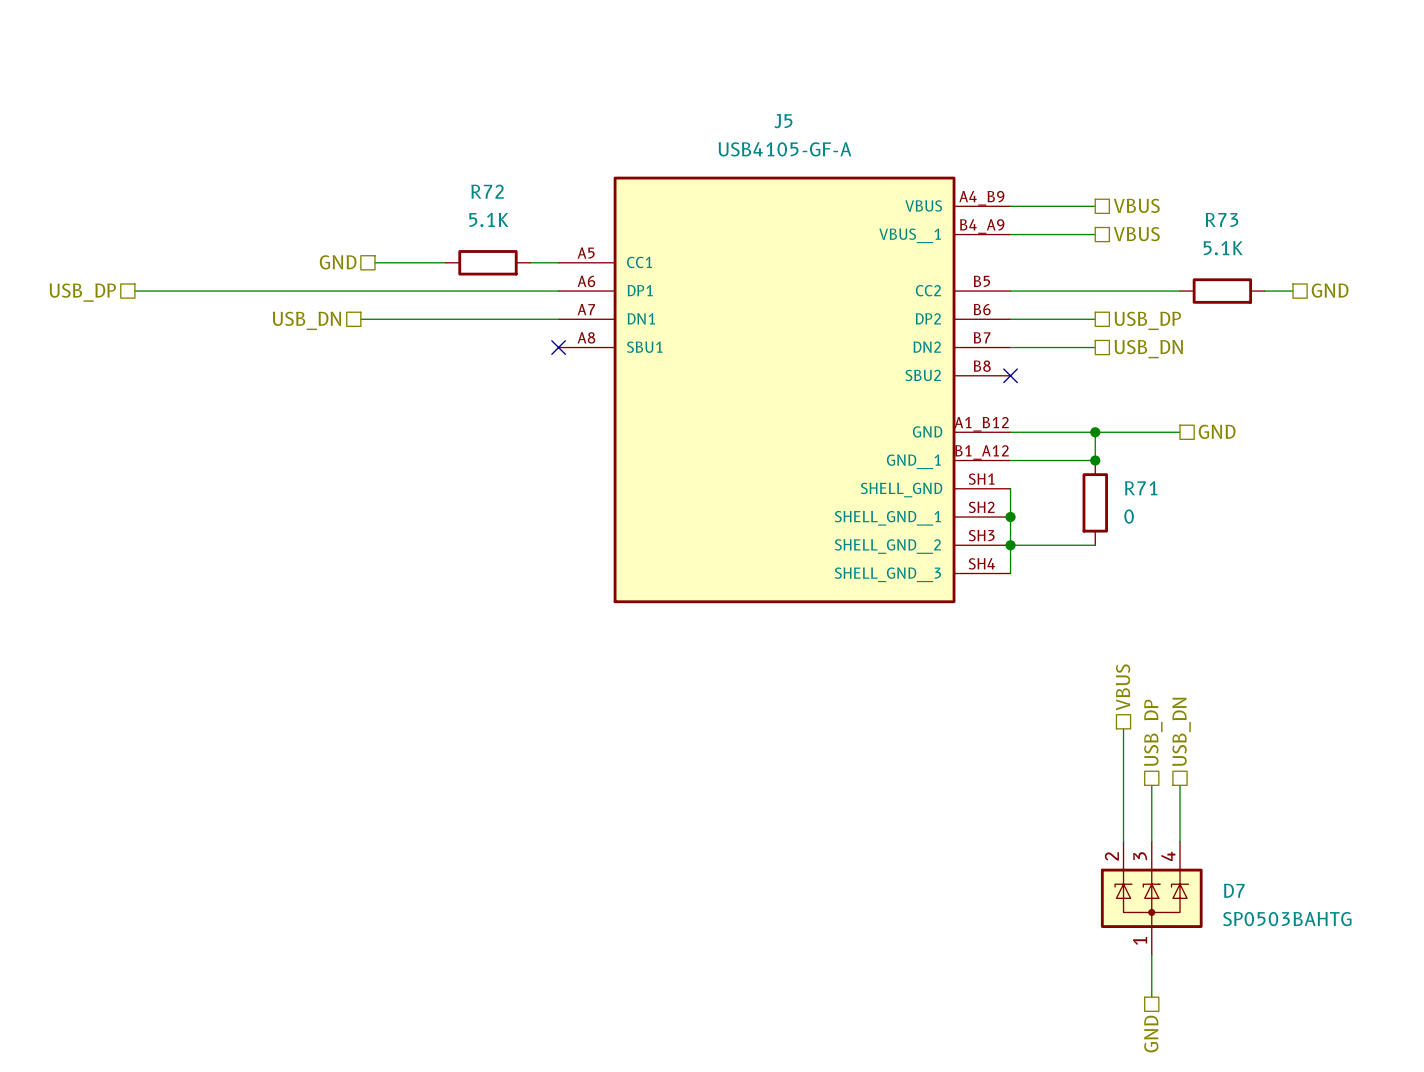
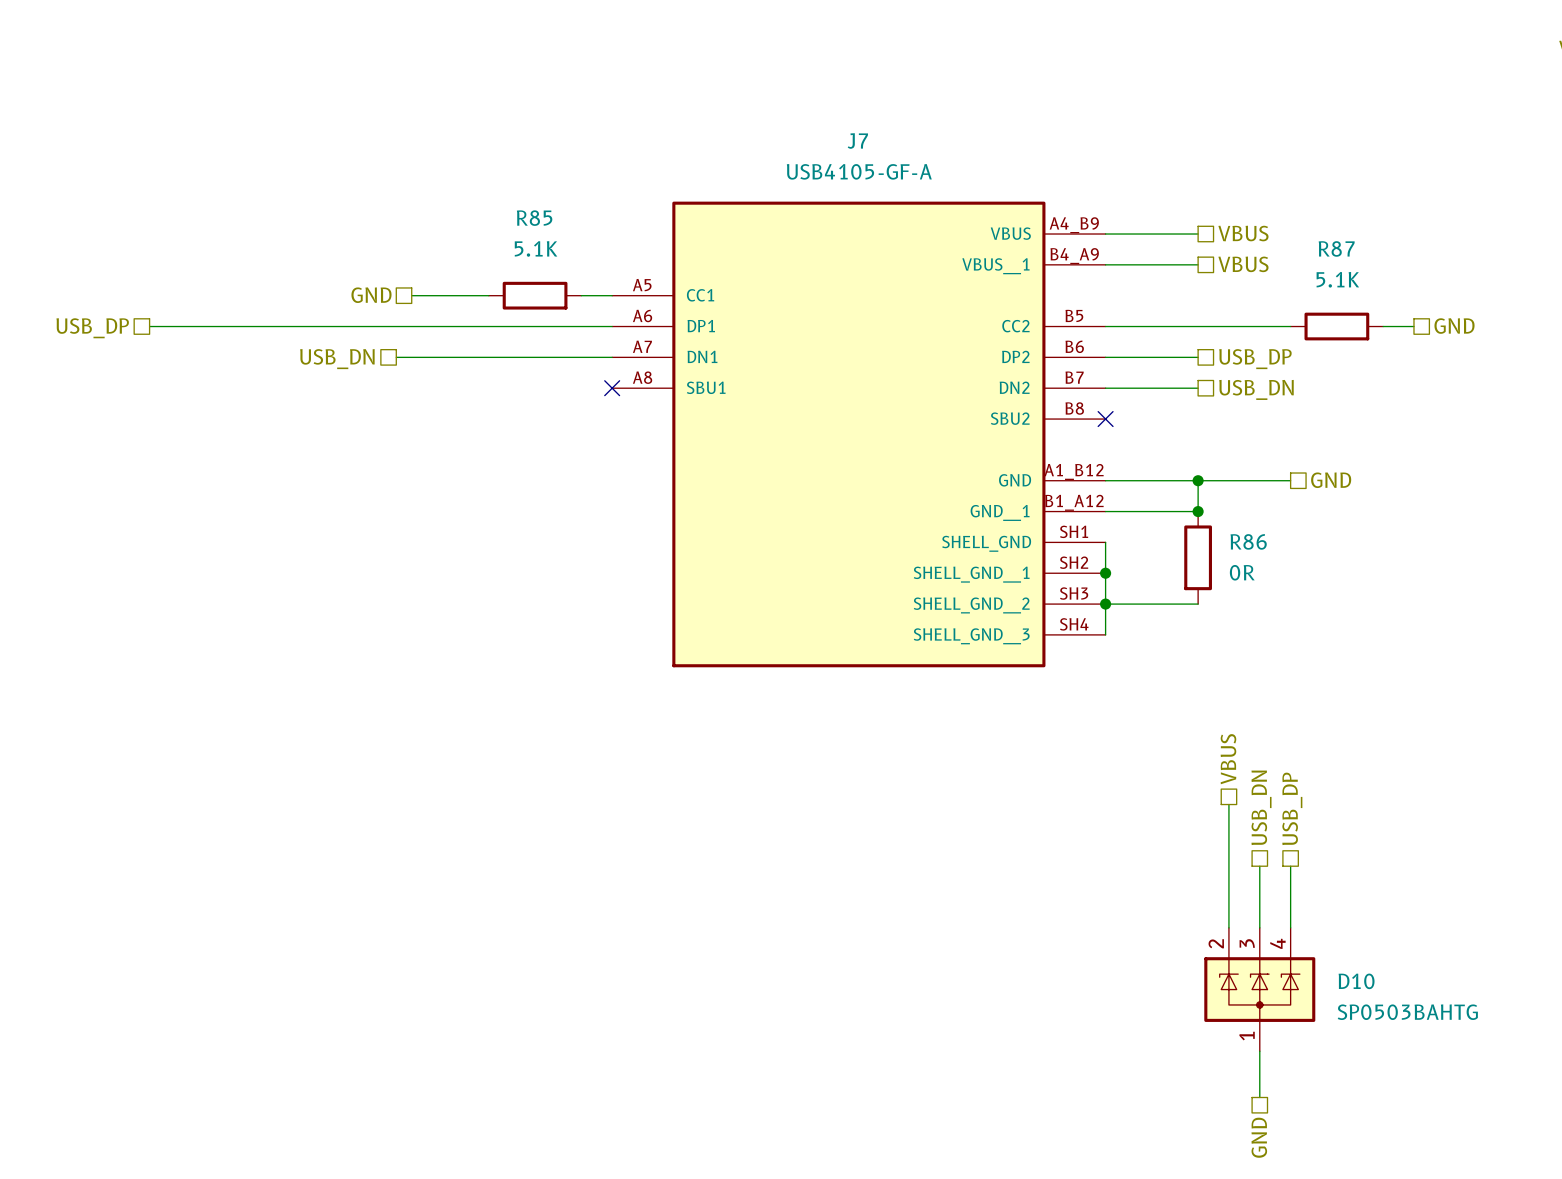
J5 name: J5 (783, 121) -> J7 (857, 141)
R72 name: R72 (487, 191) -> R85 (534, 218)
R73 name: R73 (1221, 219) -> R87 (1336, 248)
R71 name: R71 (1141, 488) -> R86 (1248, 541)
R71 value: 0 (1129, 516) -> 0R (1242, 572)
hierarchical label: USB_DN (1181, 731) -> USB_DP (1292, 808)
hierarchical label: USB_DP (1153, 732) -> USB_DN (1261, 807)
D7 name: D7 (1234, 890) -> D10 (1356, 981)

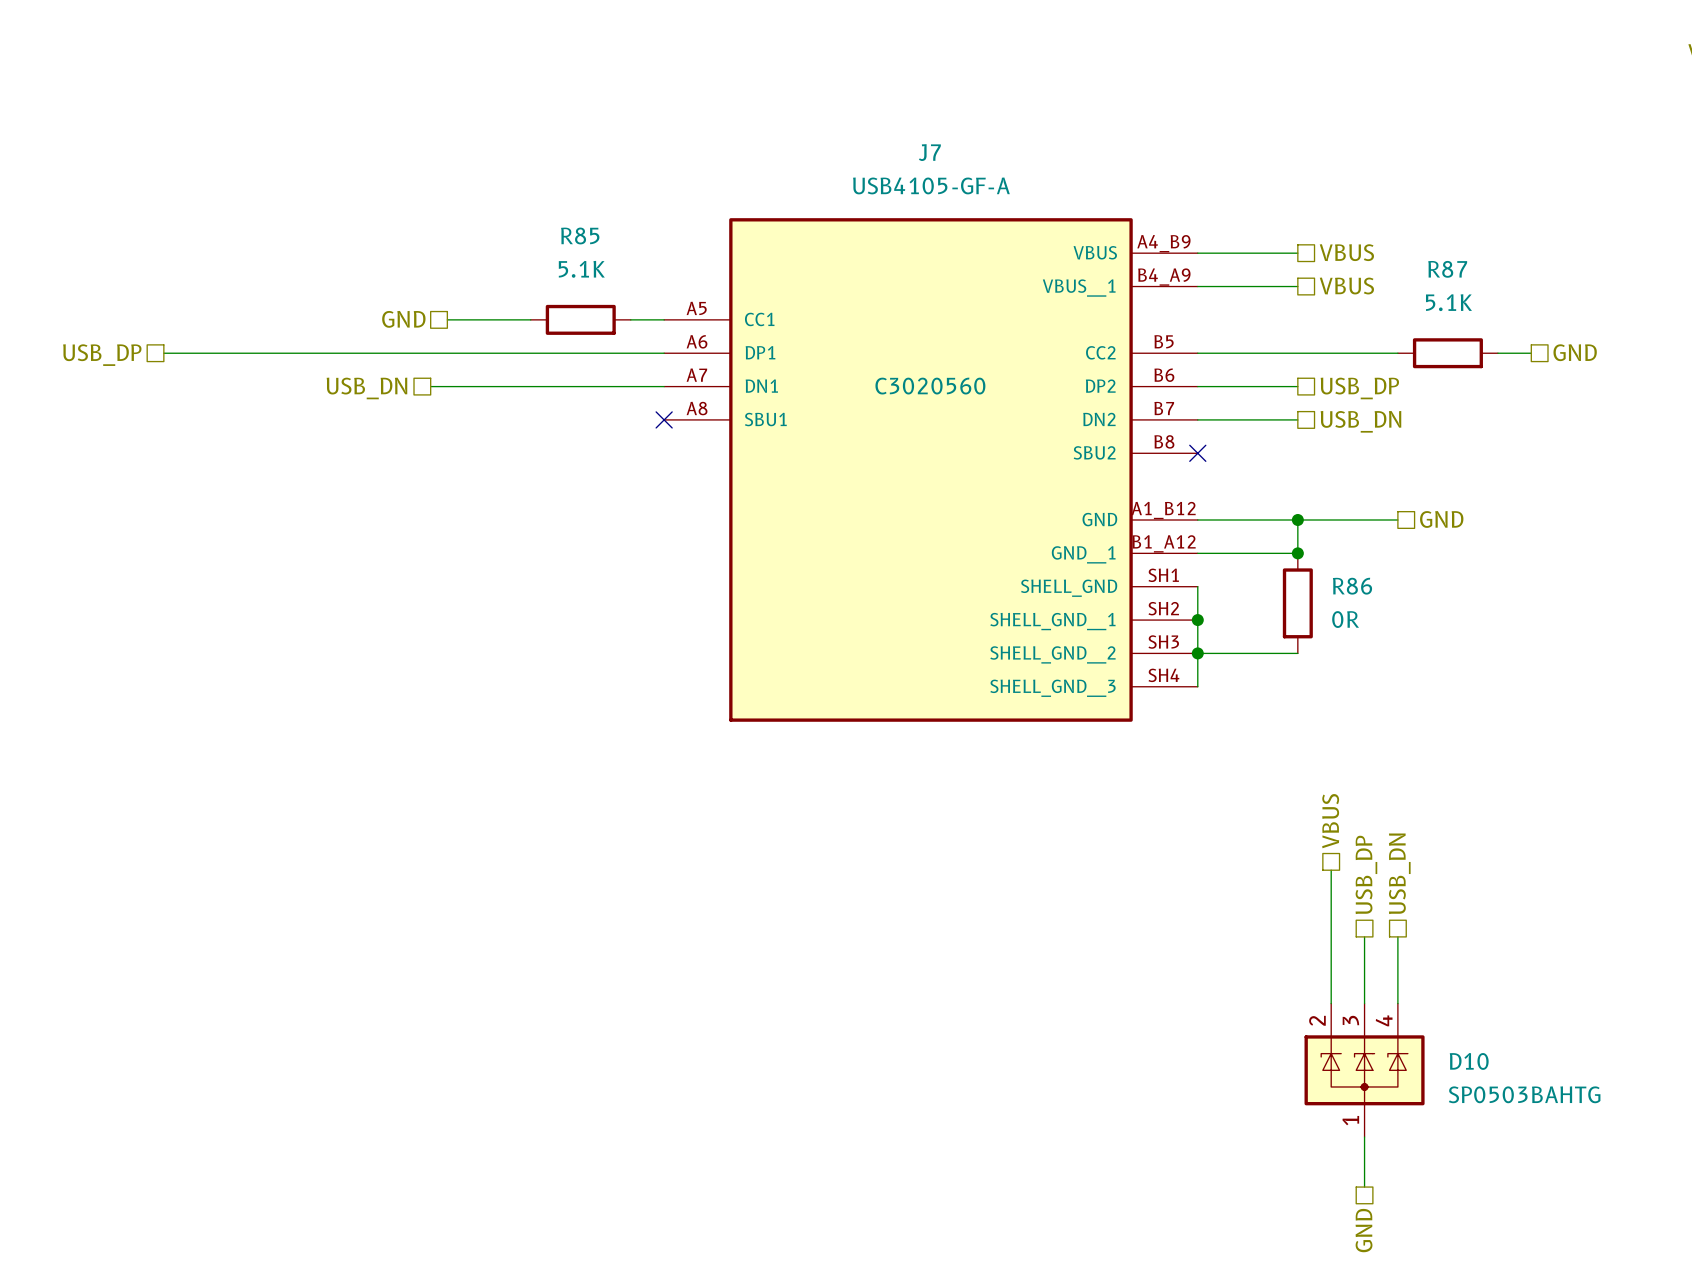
J7 text: none -> C3020560 (930, 386)
hierarchical label: USB_DN (1261, 807) -> USB_DP (1366, 874)
hierarchical label: USB_DP (1292, 808) -> USB_DN (1399, 873)

